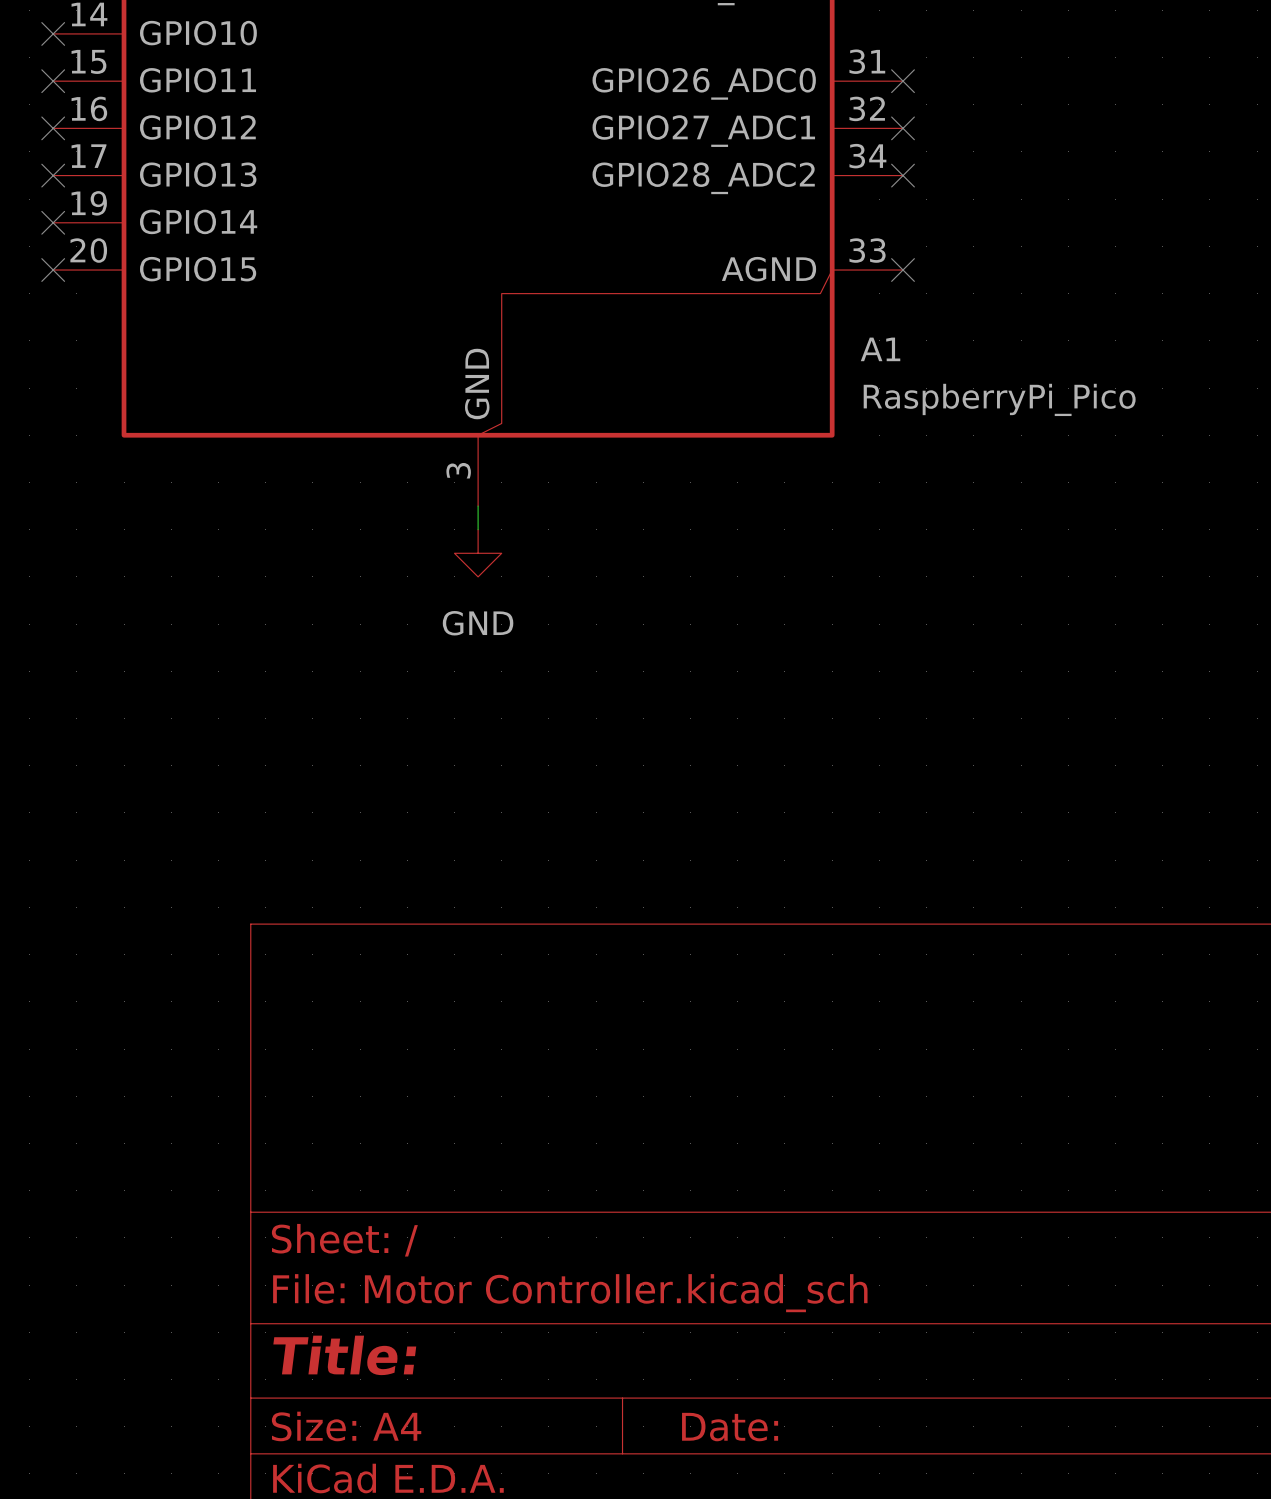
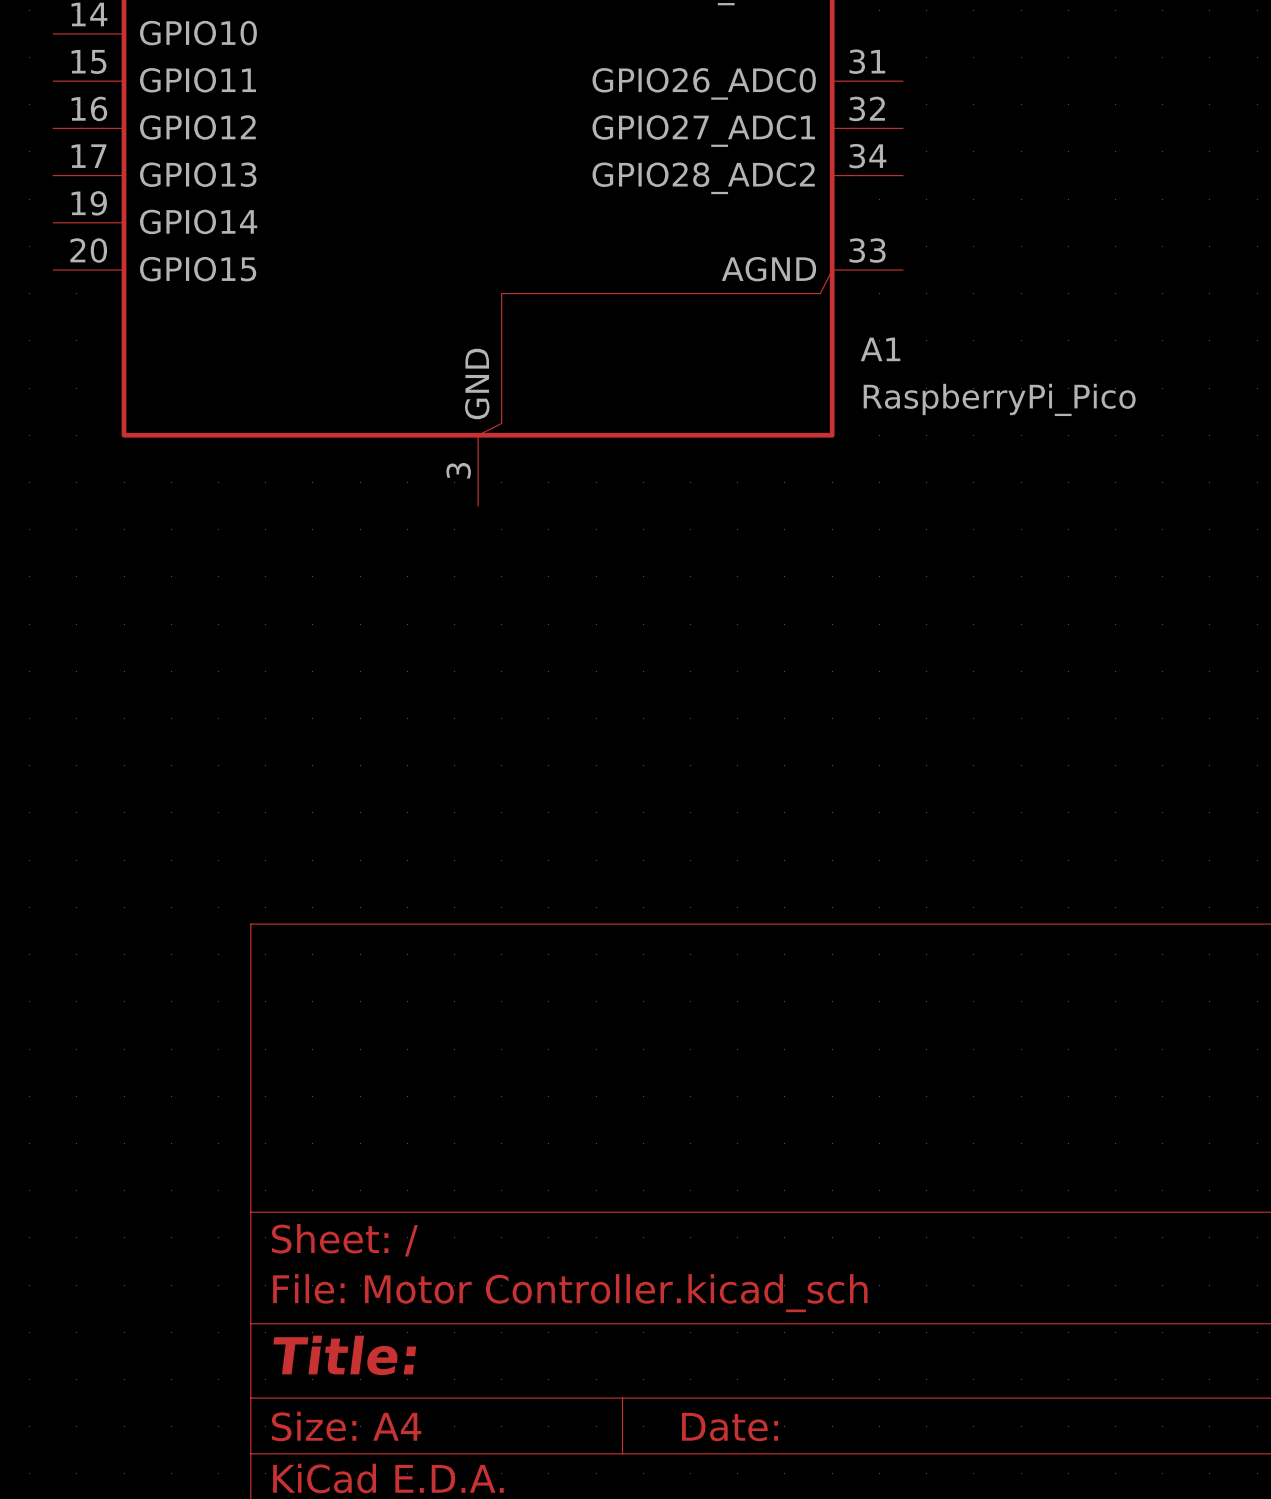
no-connect mark: (53, 33) -> none
no-connect mark: (53, 81) -> none
no-connect mark: (903, 81) -> none
no-connect mark: (53, 128) -> none
no-connect mark: (903, 128) -> none
no-connect mark: (53, 175) -> none
no-connect mark: (903, 175) -> none
no-connect mark: (53, 222) -> none
no-connect mark: (53, 270) -> none
no-connect mark: (903, 270) -> none
wire: (478, 506) (478, 529) -> none
power symbol: GND (478, 553) -> none

